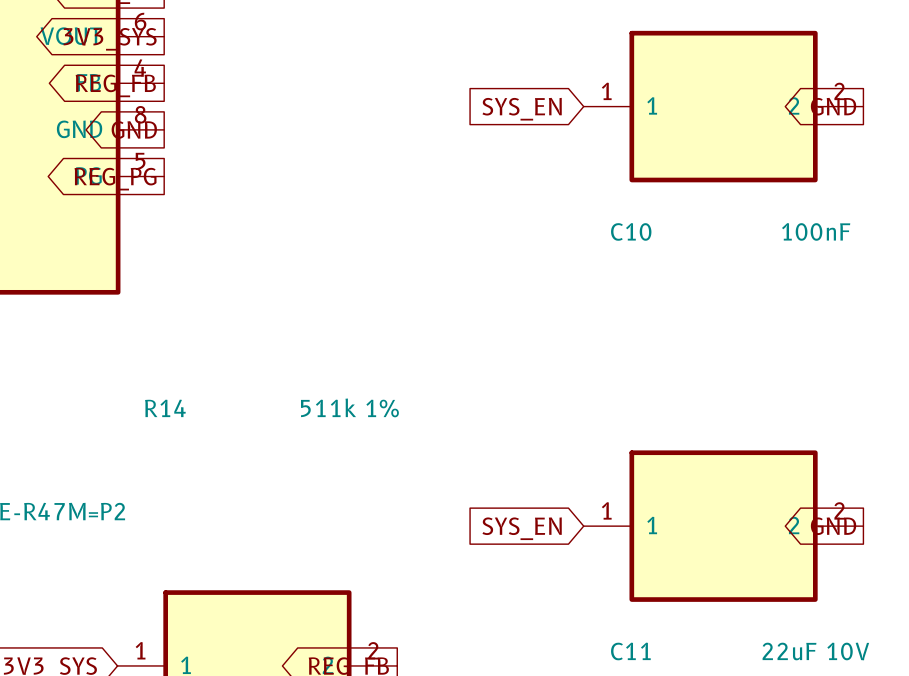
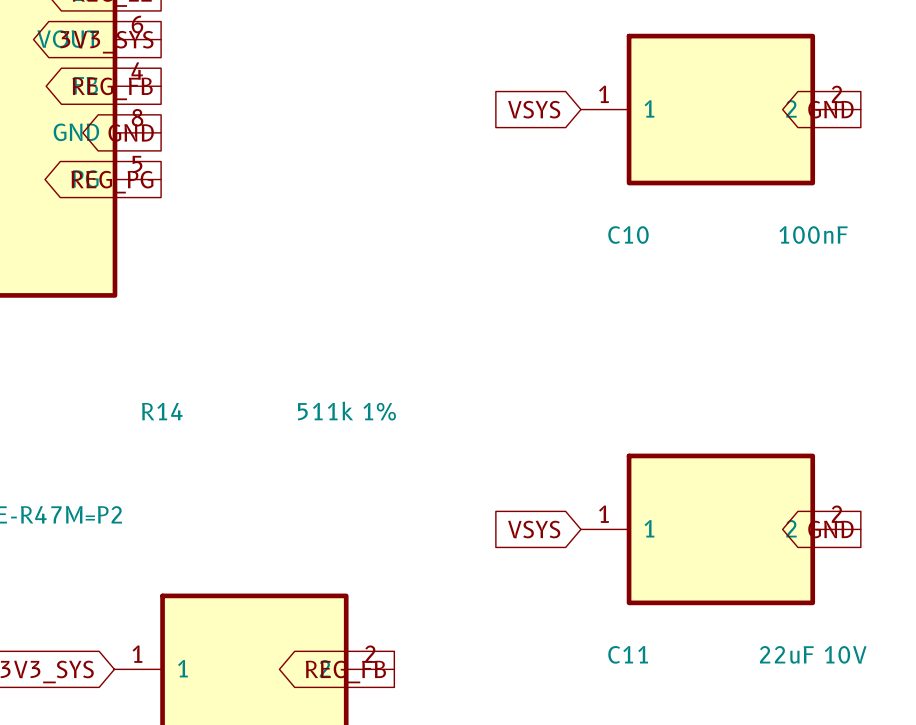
global label: SYS_EN (522, 109) -> VSYS (534, 109)
global label: SYS_EN (522, 528) -> VSYS (534, 529)

